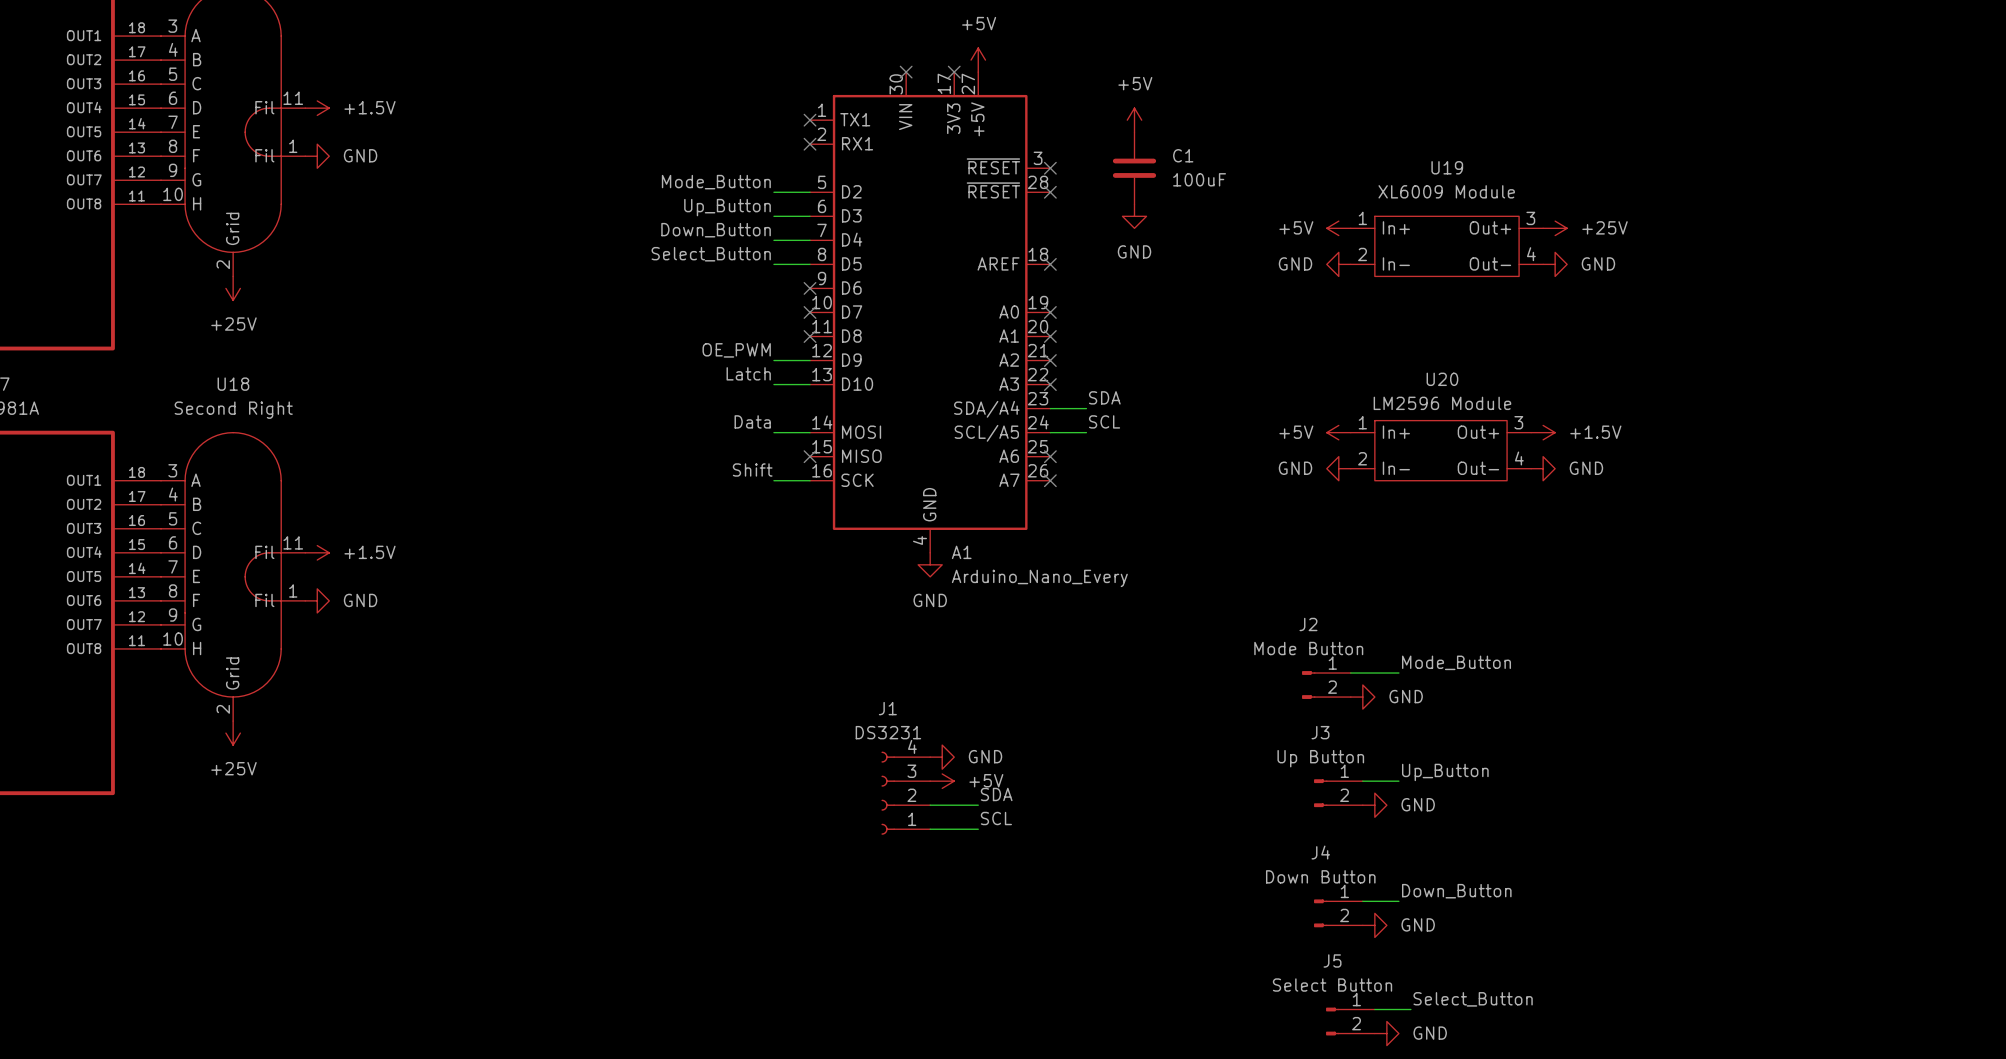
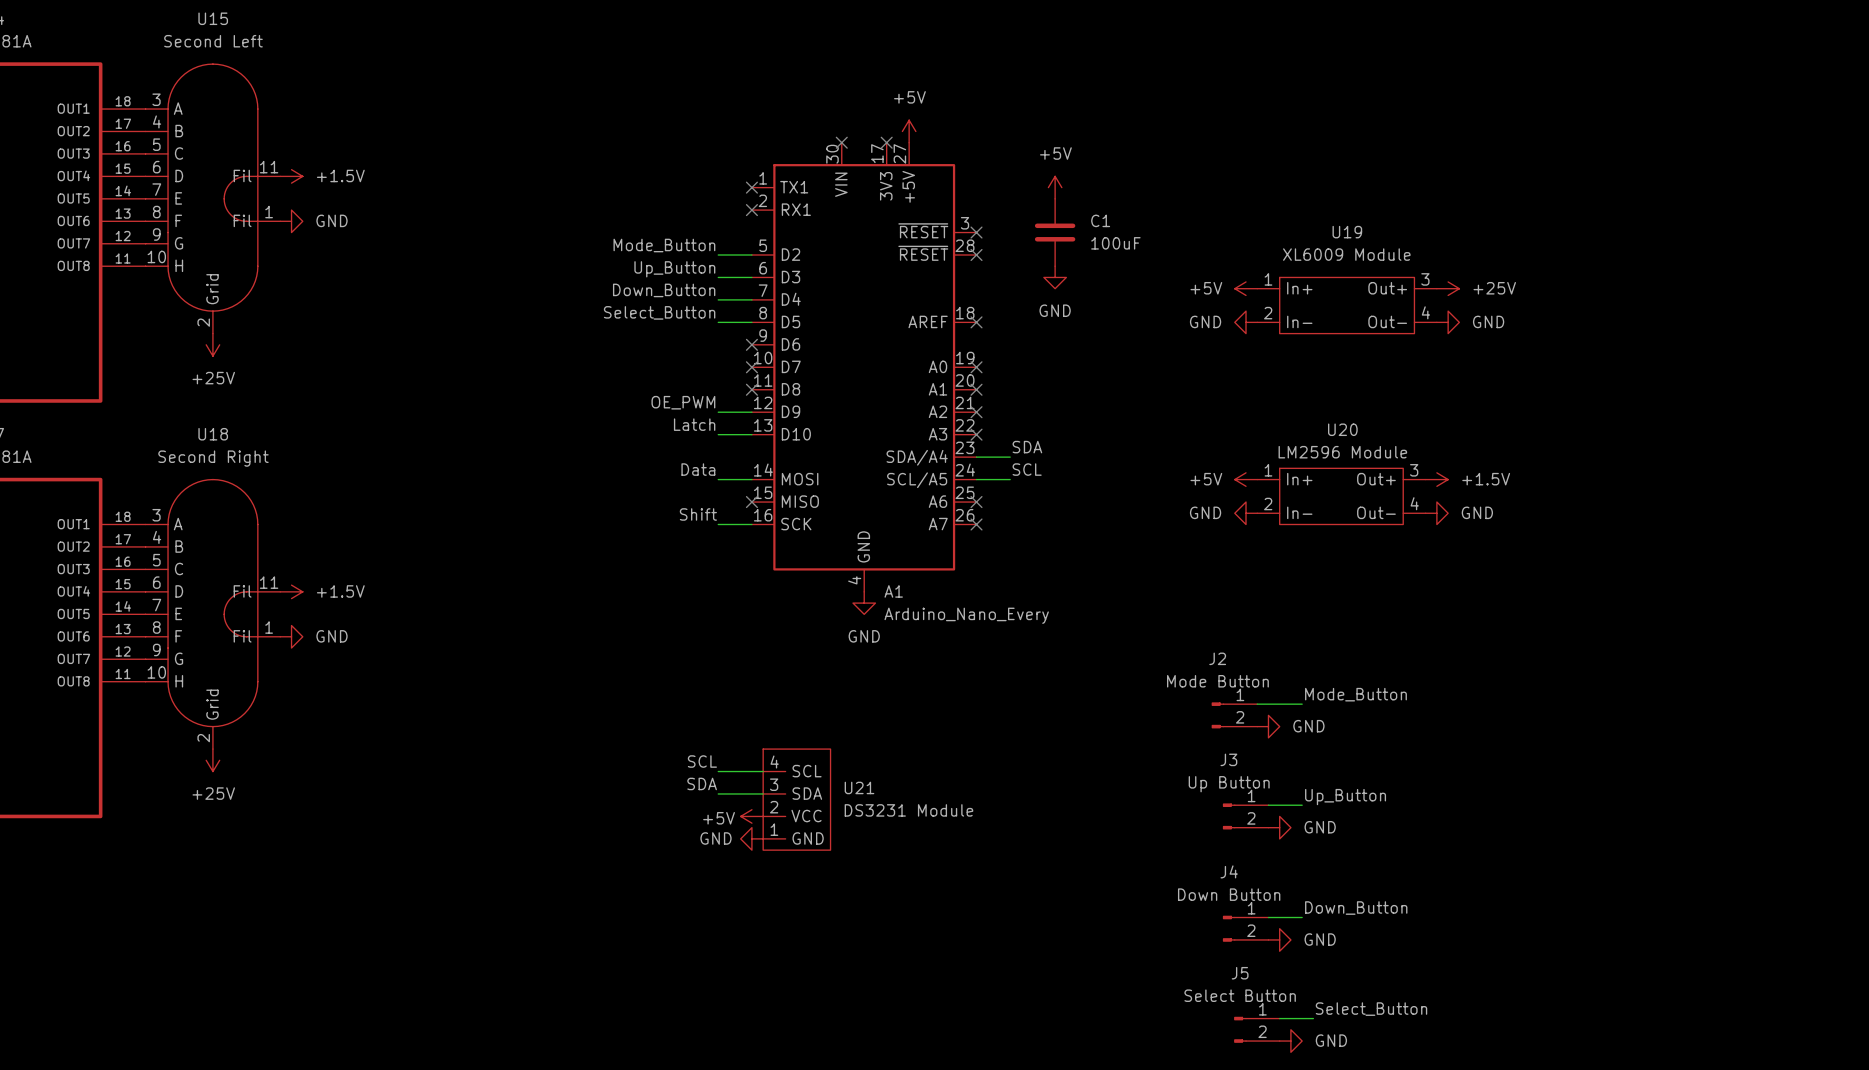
power symbol rotation: 0° (942, 757) -> 180° (751, 838)
power symbol position: GND (942, 757) -> GND (751, 838)
U21: none -> DS3231 Module (796, 799)
power symbol rotation: 0° (942, 781) -> 180° (751, 816)
power symbol position: +5V (942, 781) -> +5V (751, 816)
J1: DS3231 (905, 793) -> none
label position: SDA (996, 794) -> SDA (702, 783)
wire: (930, 805) (978, 805) -> (718, 793) (763, 793)
label position: SCL (996, 818) -> SCL (702, 761)
wire: (930, 829) (978, 829) -> (718, 771) (763, 771)

